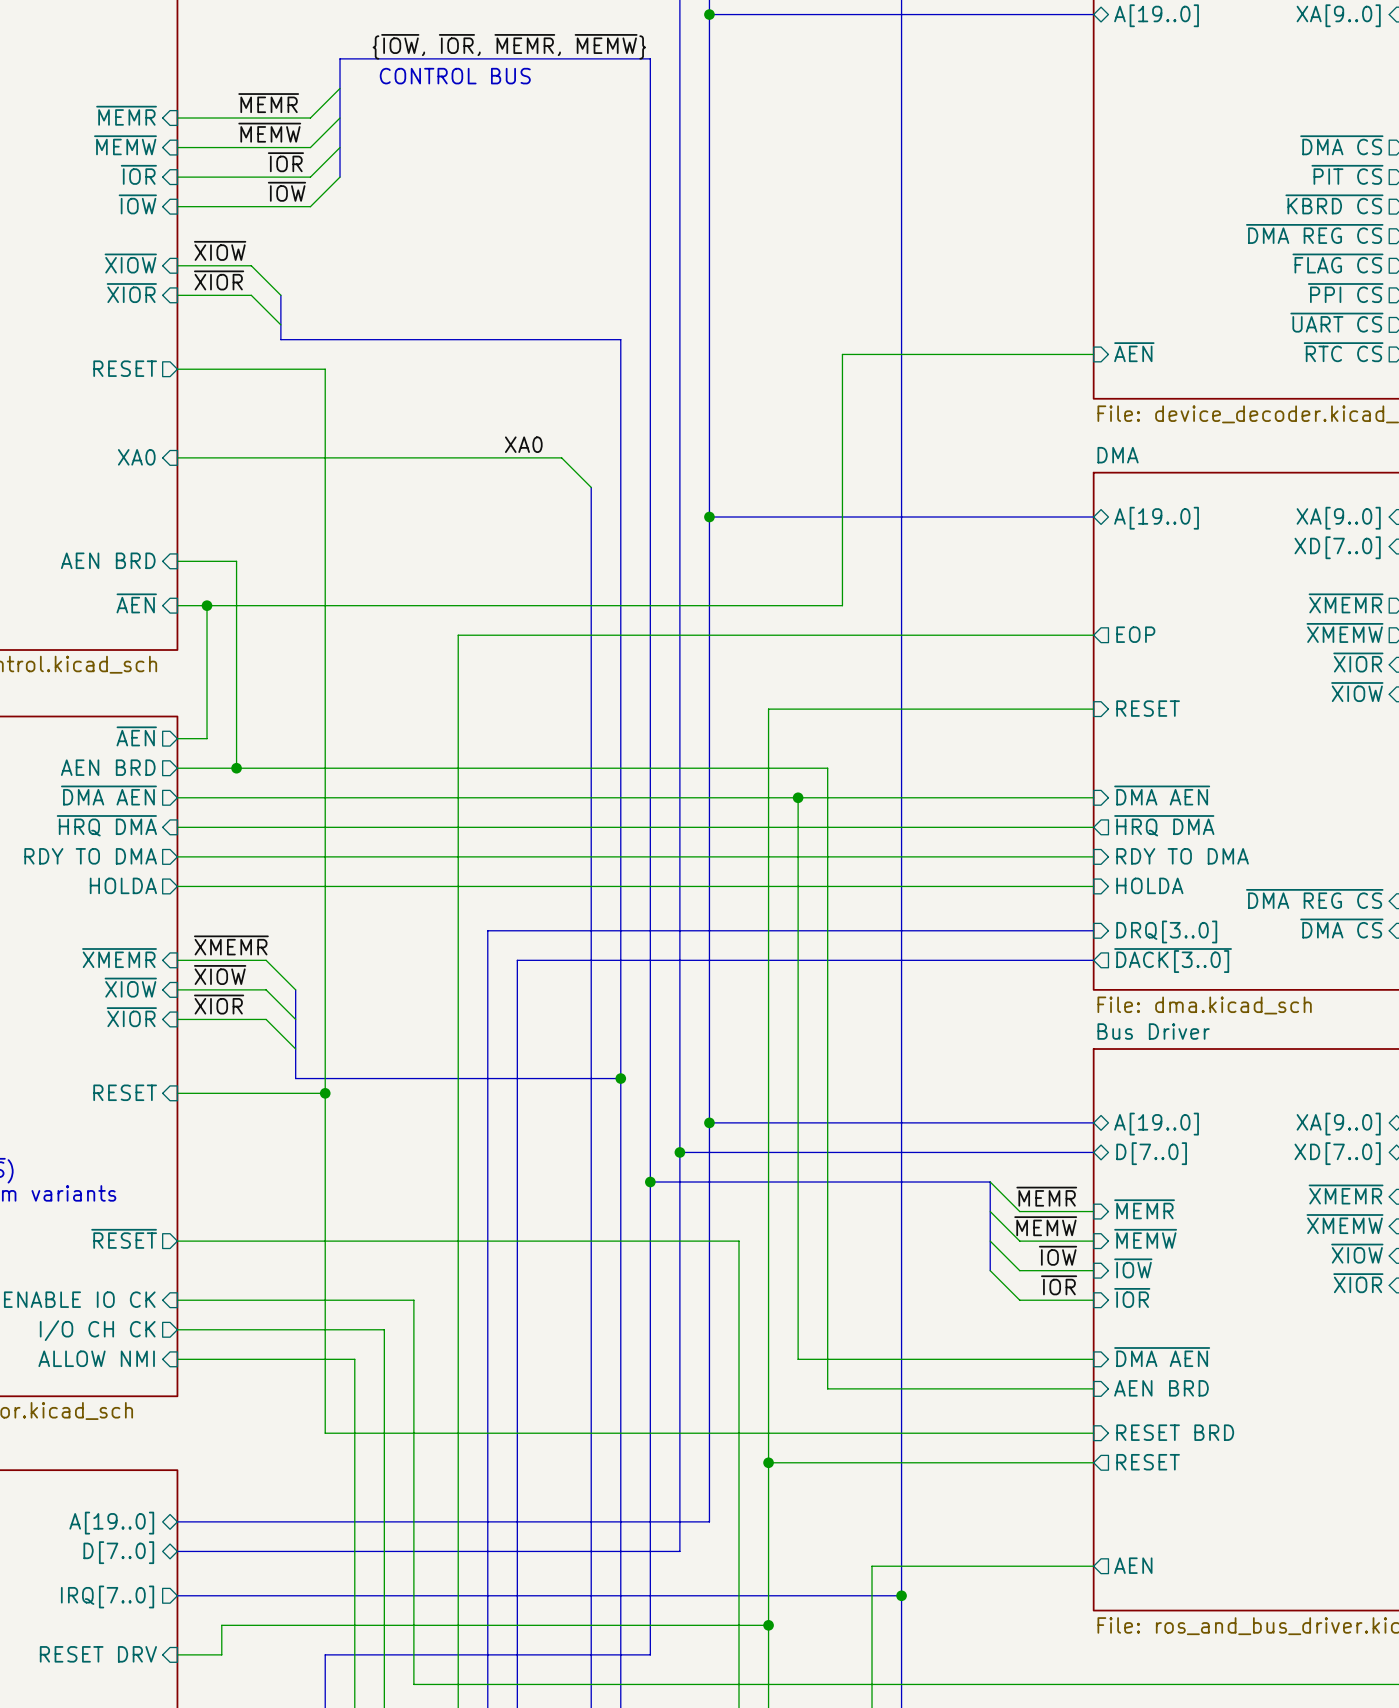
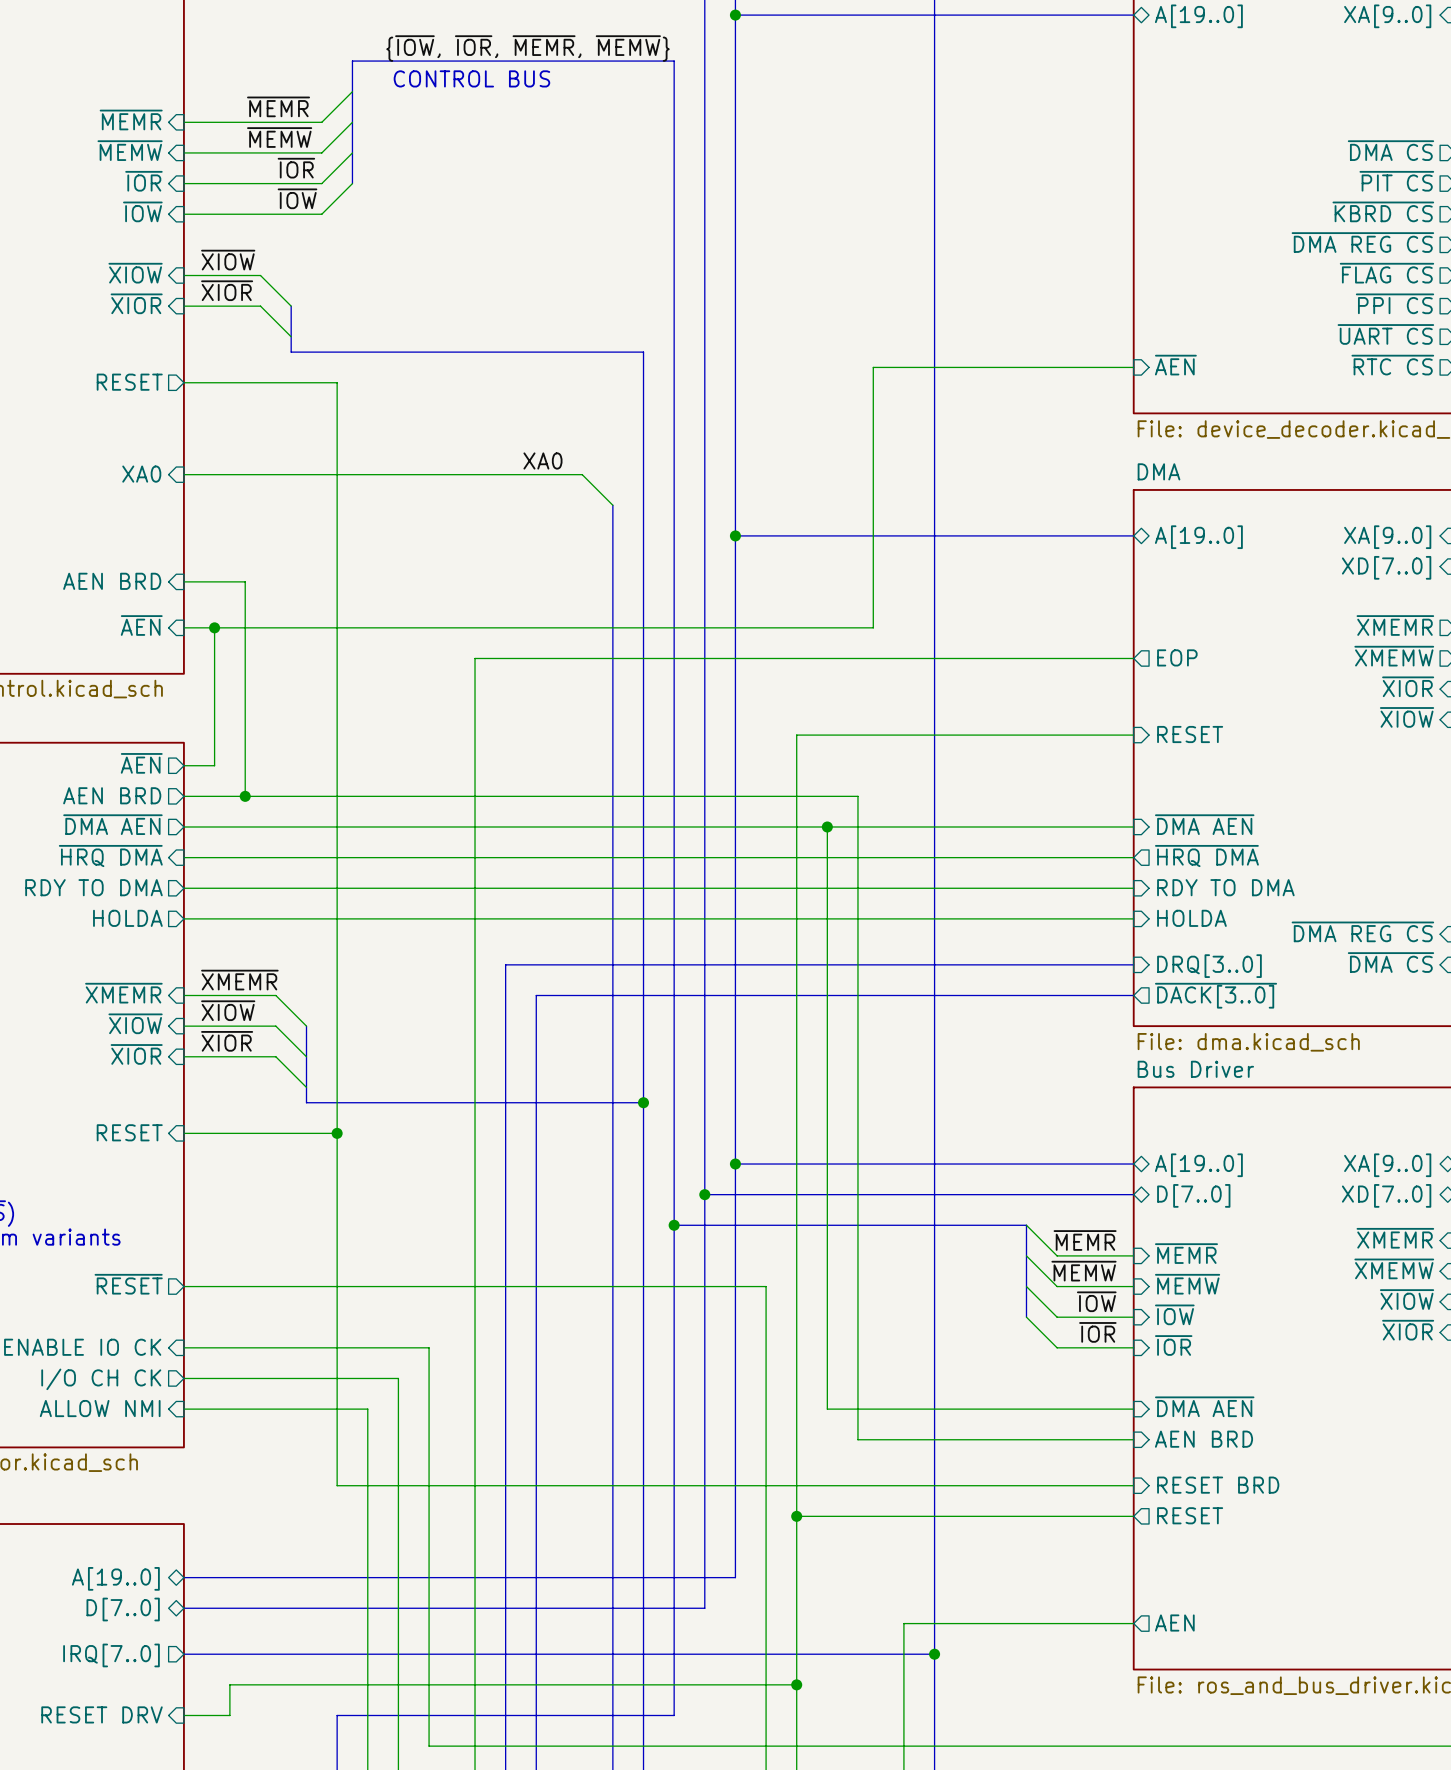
bus: (295, 1063) (295, 1078) (620, 1078) -> (306, 1102) (643, 1102)
junction position: (620, 1078) -> (643, 1102)

